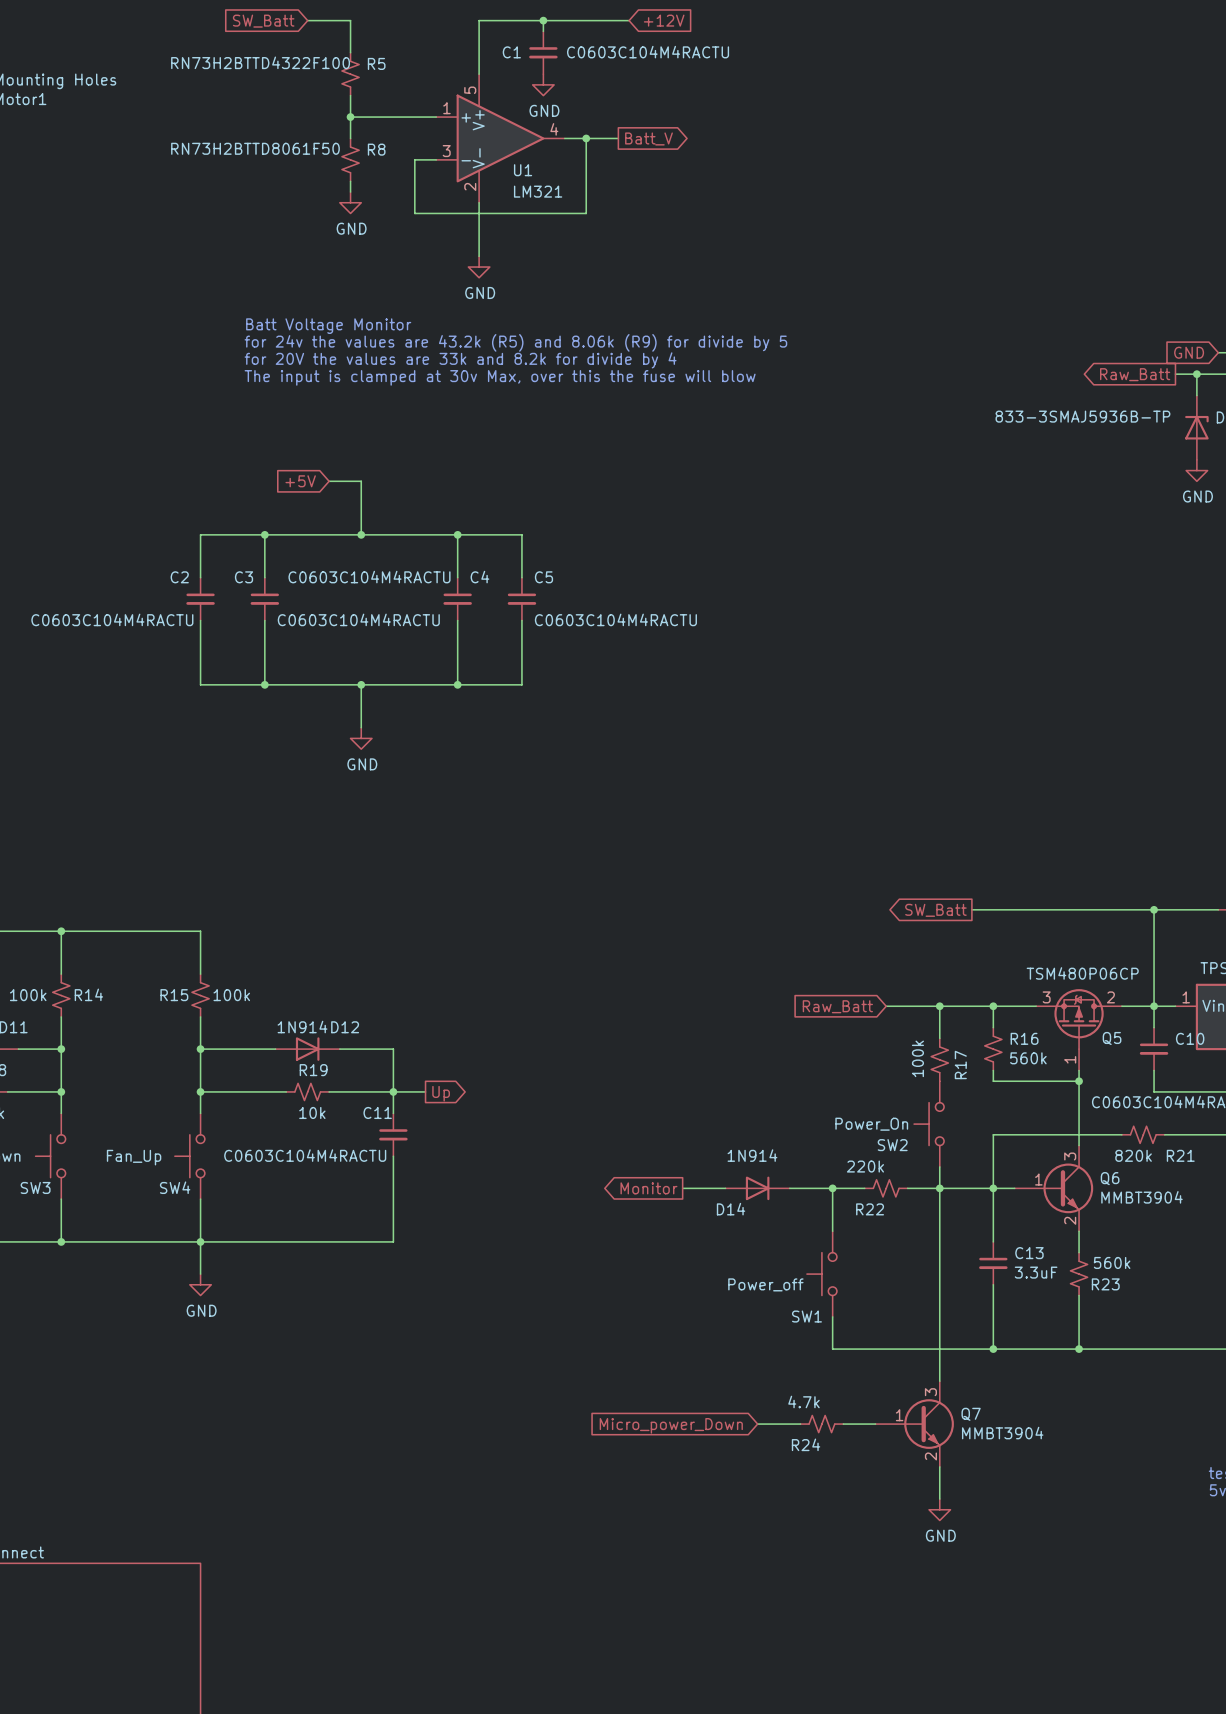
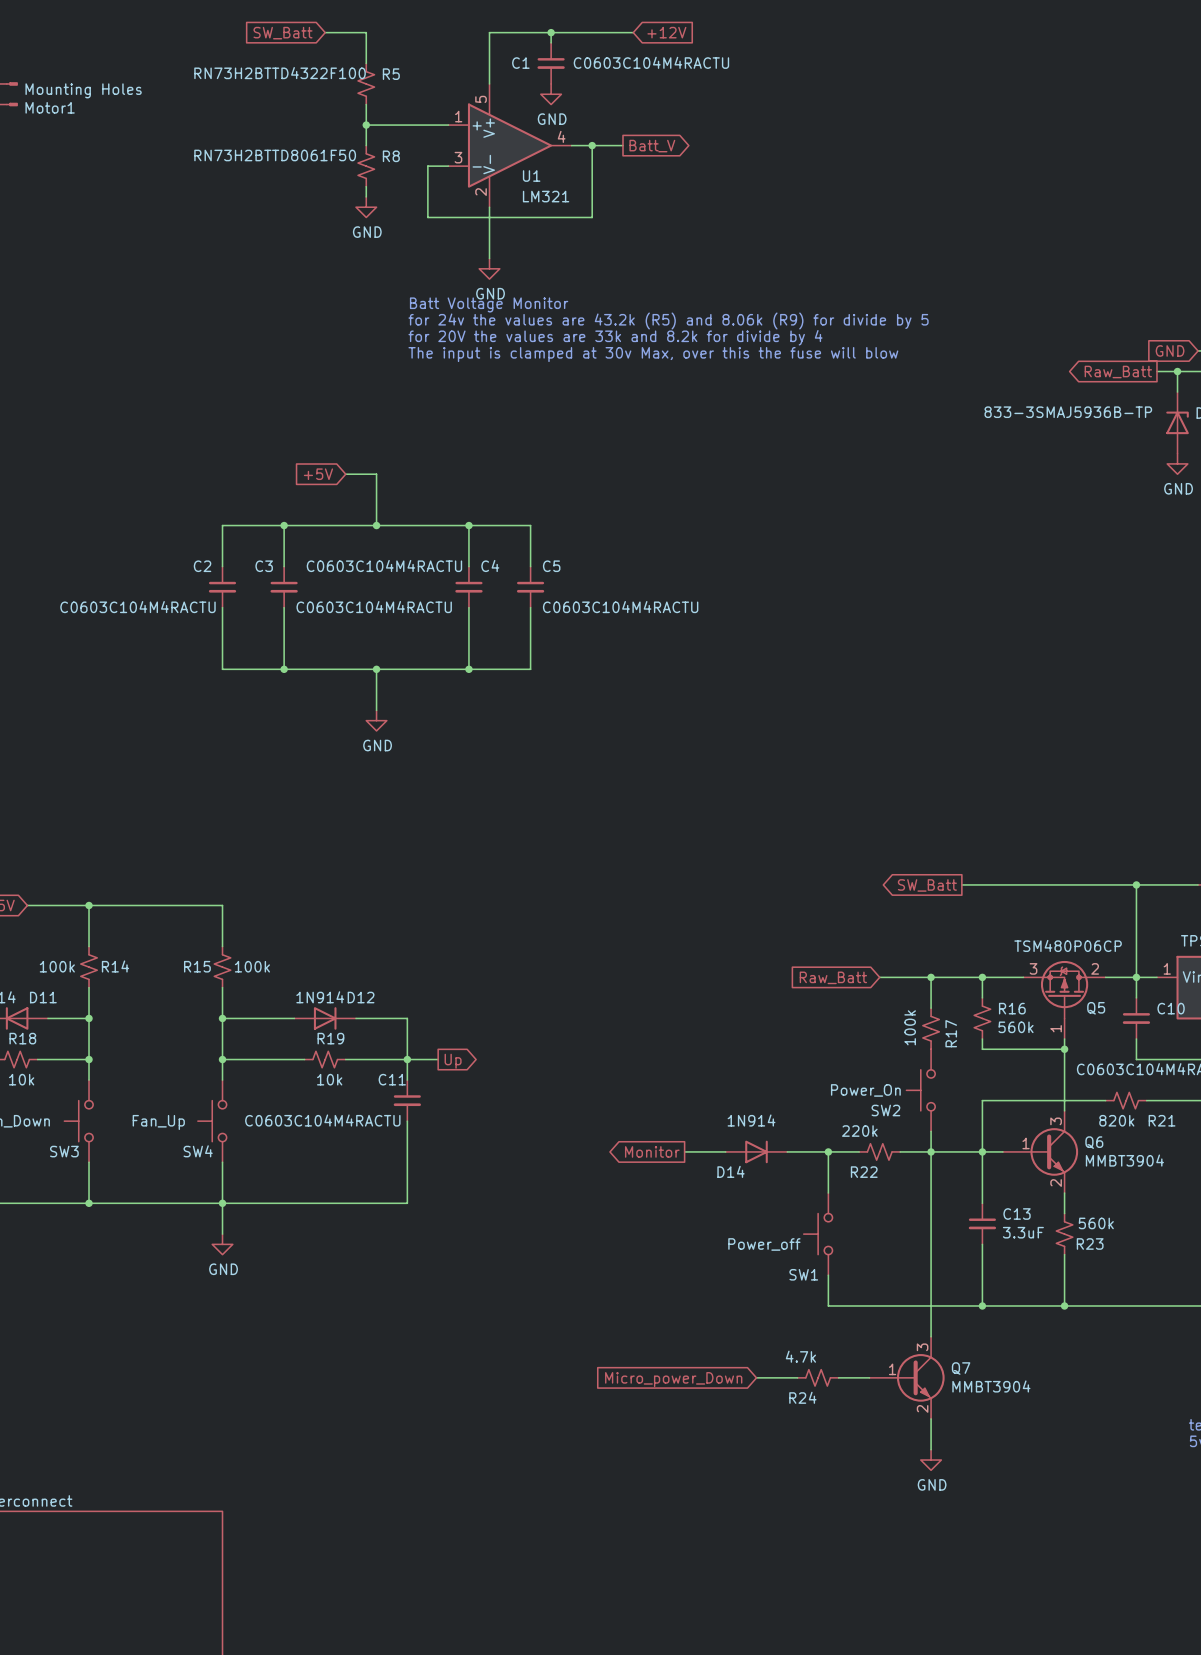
text position: Batt Voltage Monitor (328, 326) -> Batt Voltage Monitor (489, 304)
text position: for 24v the values are 43.2k (R5) and 8.06k (R9) for divide by 5 (515, 342) -> for 24v the values are 43.2k (R5) and 8.06k (R9) for divide by 5 (668, 320)
text position: for 20V the values are 33k and 8.2k for divide by 4 (460, 360) -> for 20V the values are 33k and 8.2k for divide by 4 (615, 337)
text position: The input is clamped at 30v Max, over this the fuse will blow (500, 377) -> The input is clamped at 30v Max, over this the fuse will blow (653, 354)

